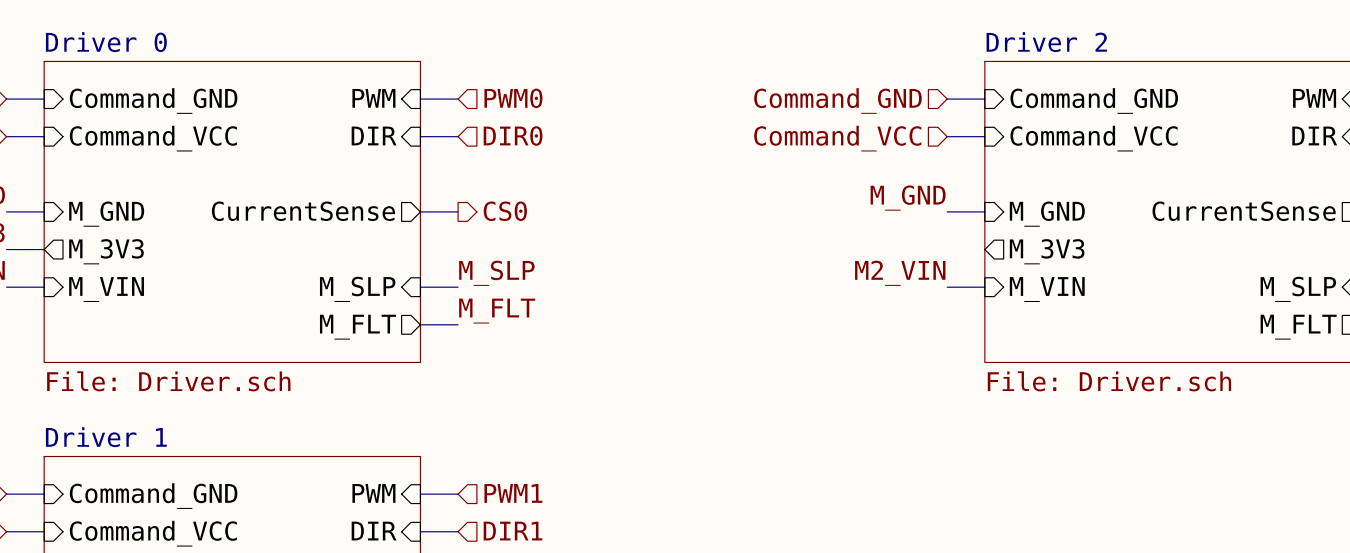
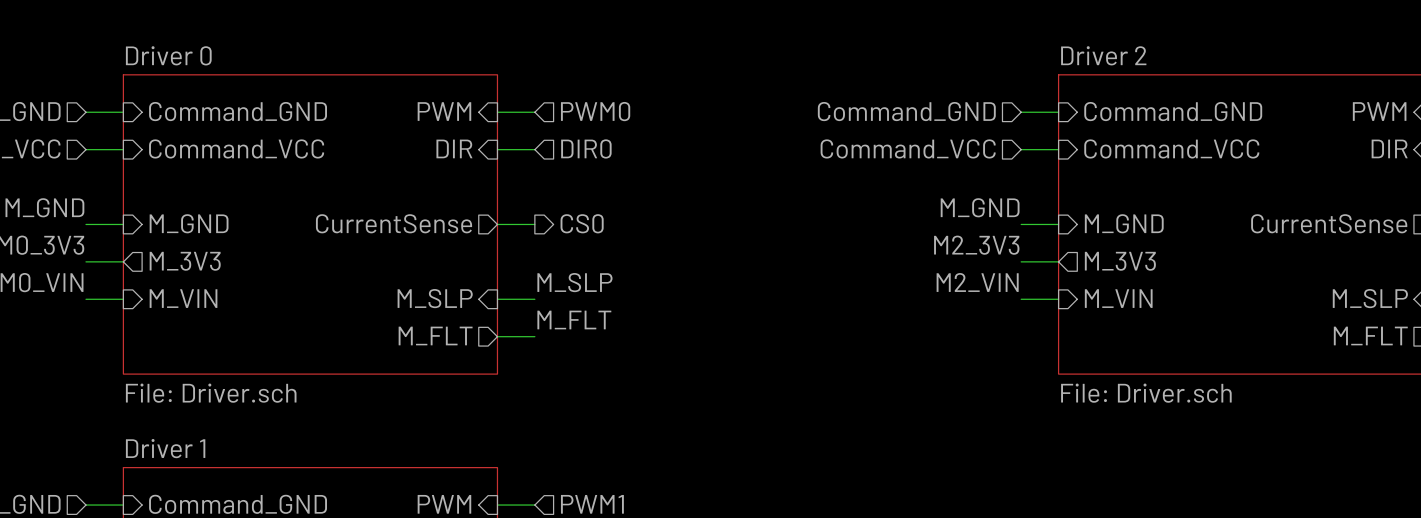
label: none -> M2_3V3 (976, 245)
wire: none -> (1021, 261) (1058, 261)

